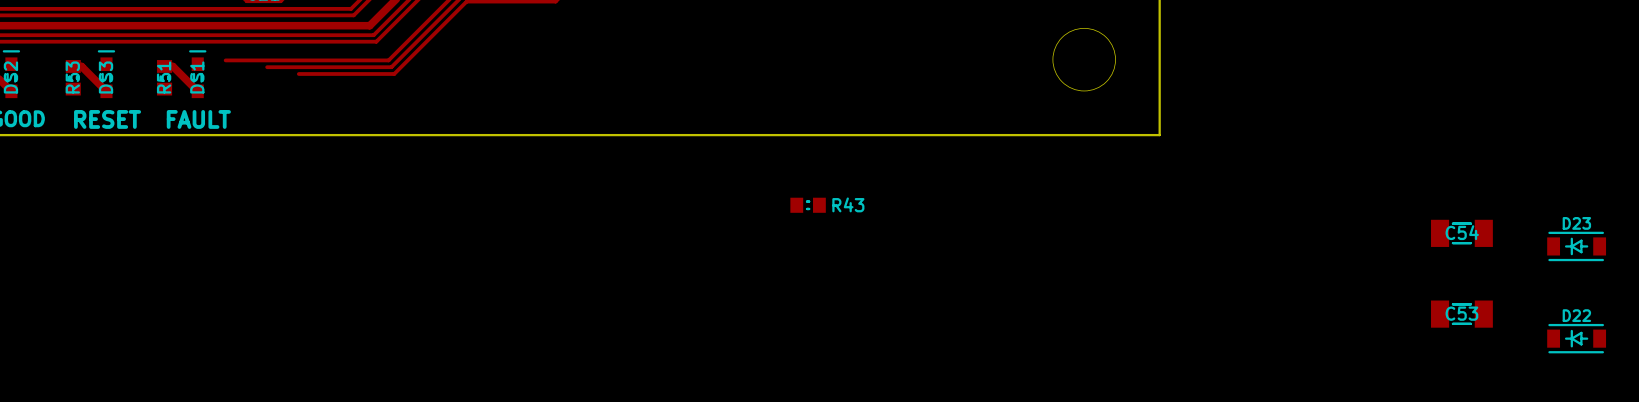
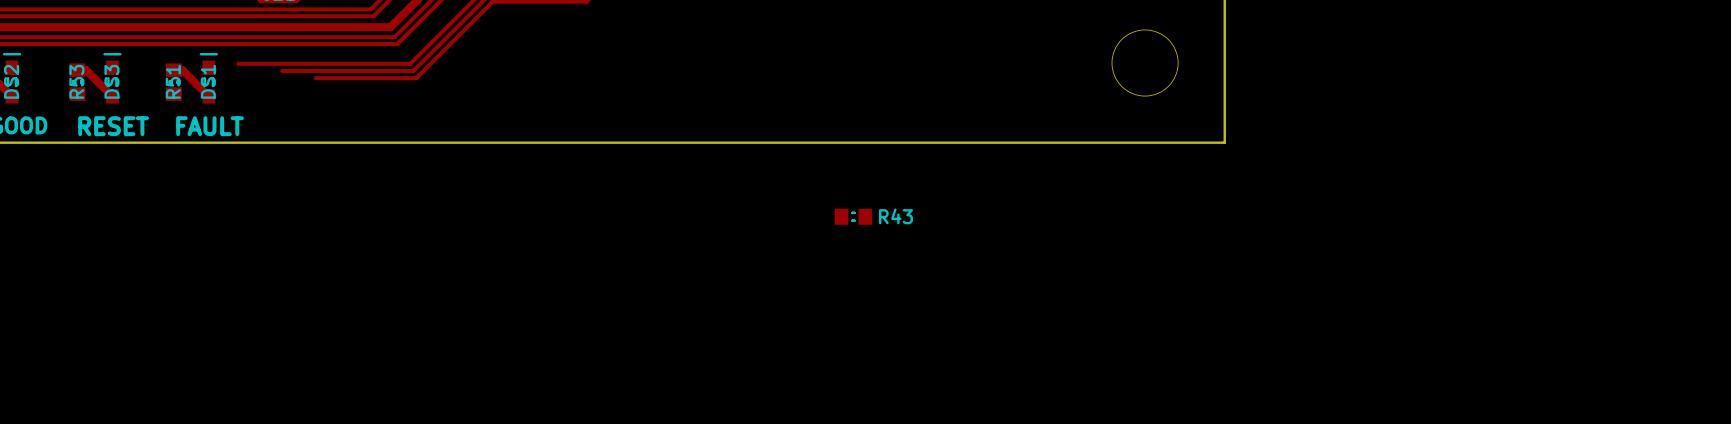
C54: (1461, 233) -> none
D23: (1576, 246) -> none
C53: (1461, 314) -> none
D22: (1576, 338) -> none

